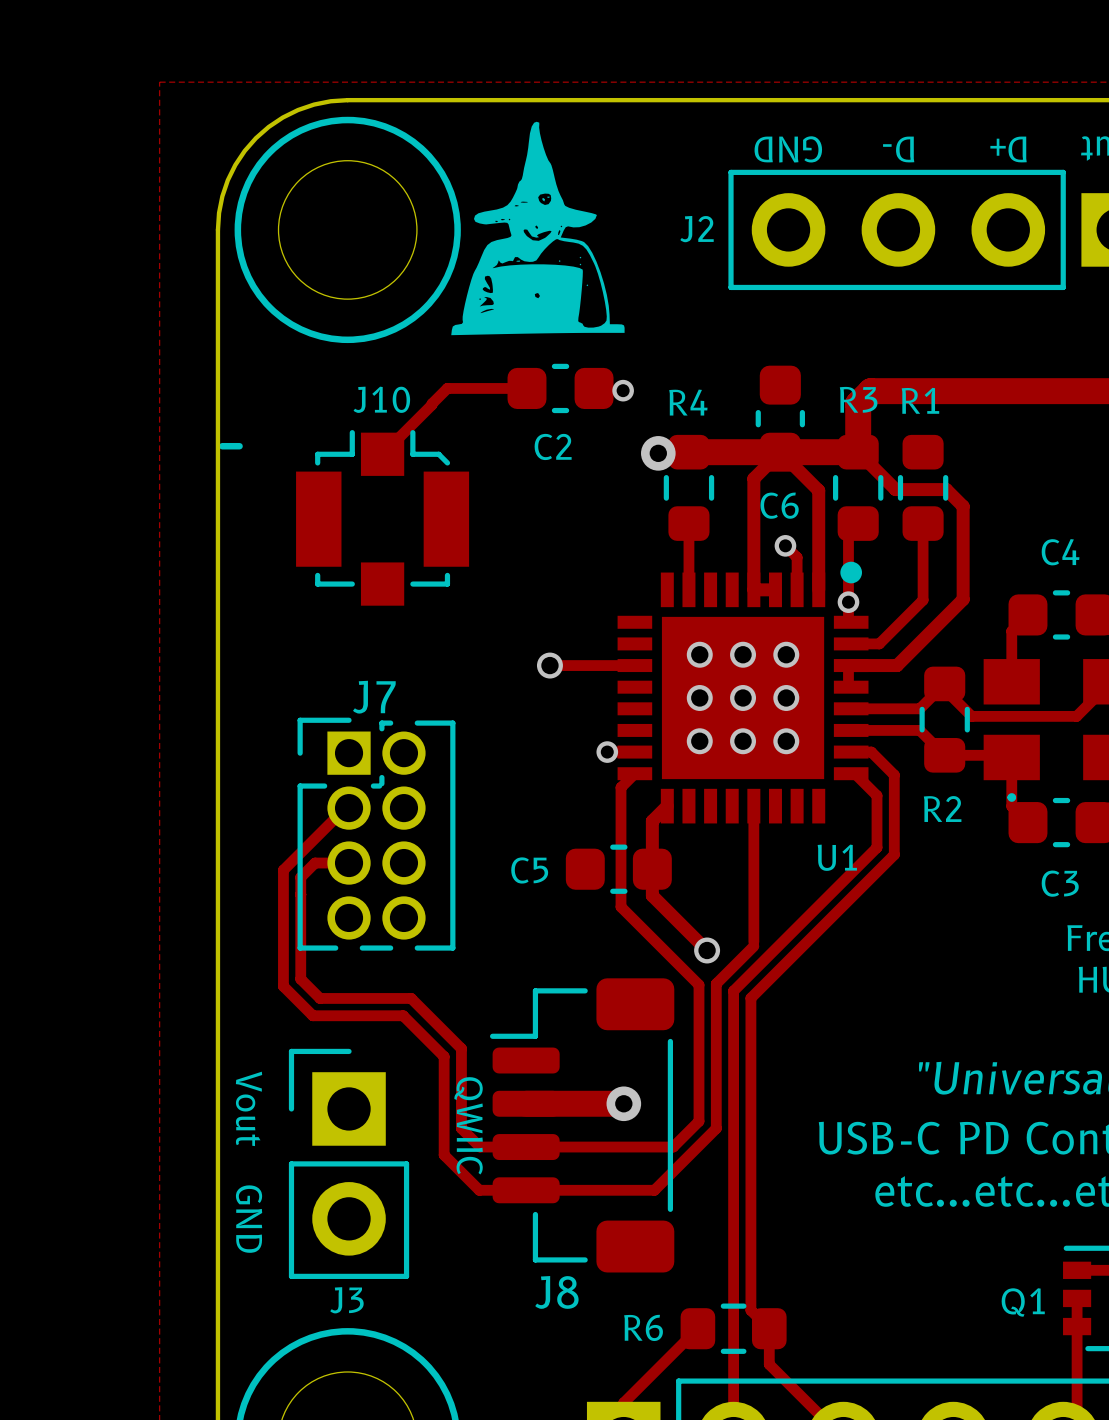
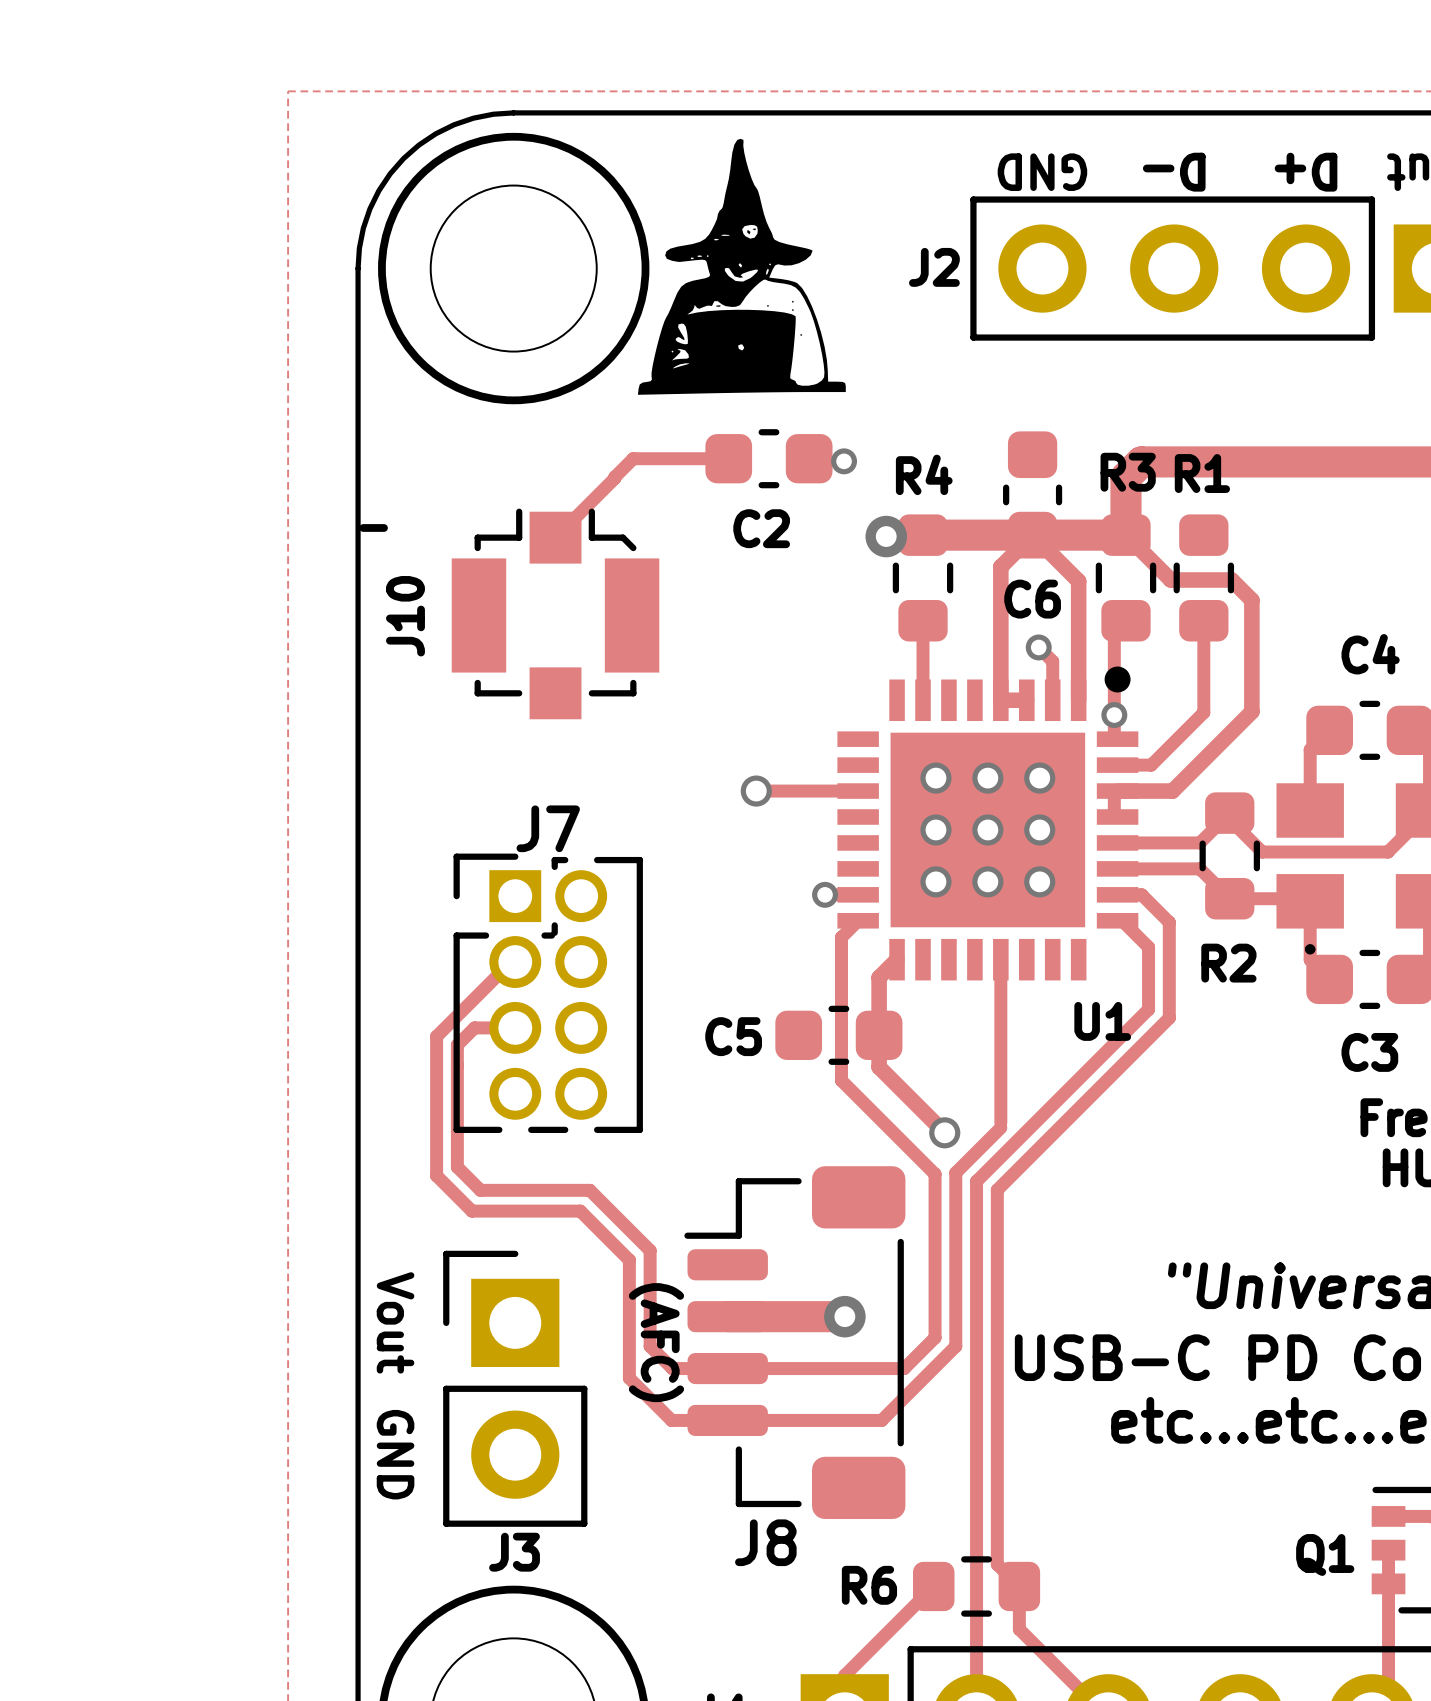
J10 name rotation: 0° (381, 399) -> 90° counterclockwise (405, 616)
J10 name position: J10 (381, 399) -> J10 (405, 616)
text: QWIIC (468, 1125) -> (AFC) (656, 1342)

